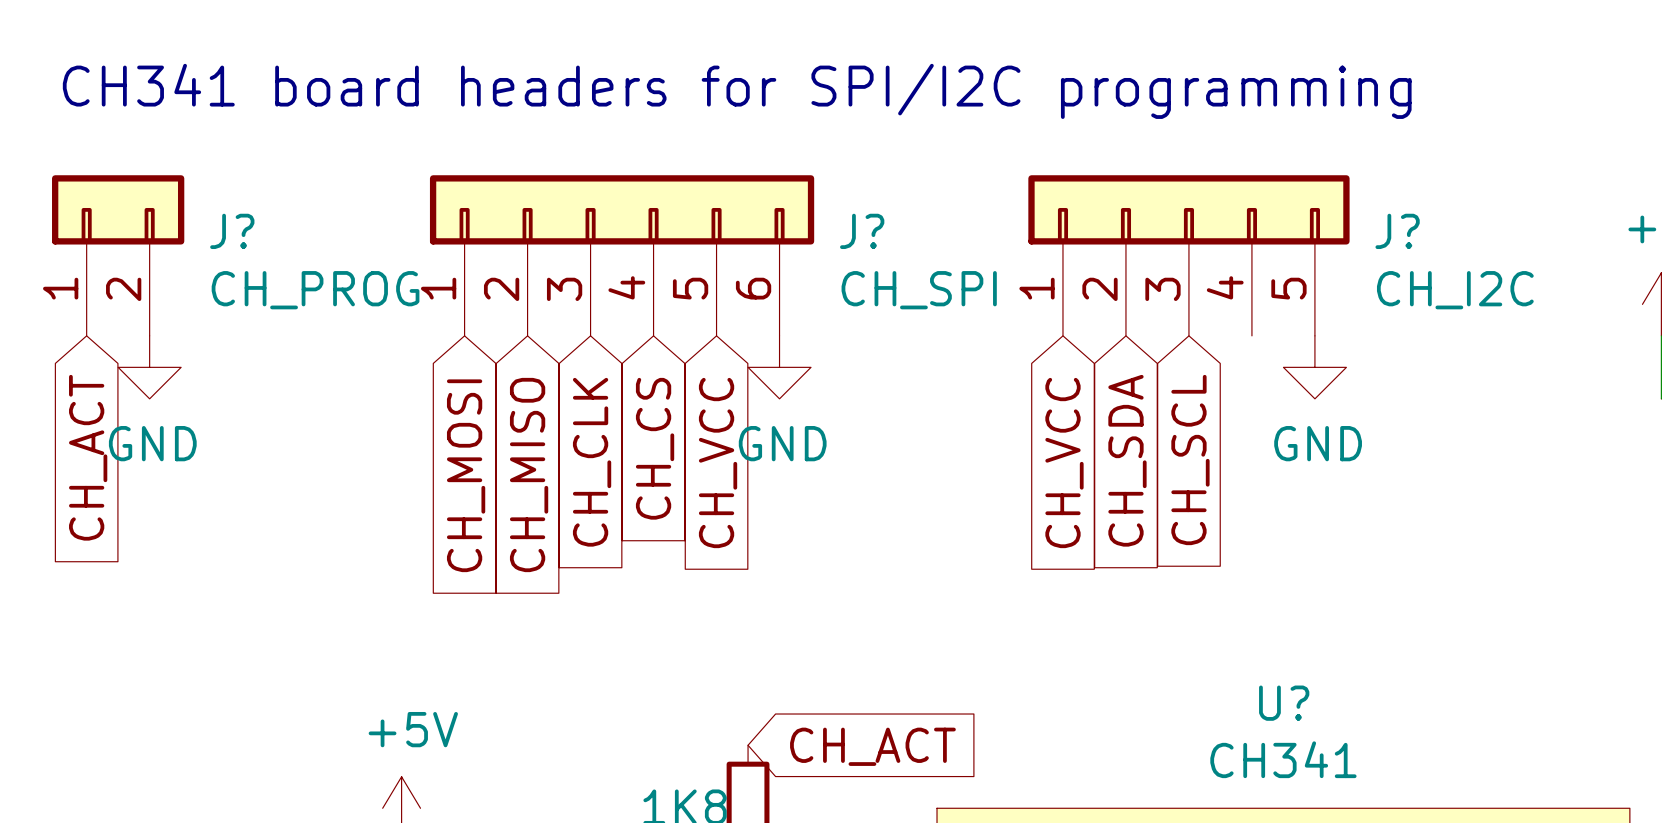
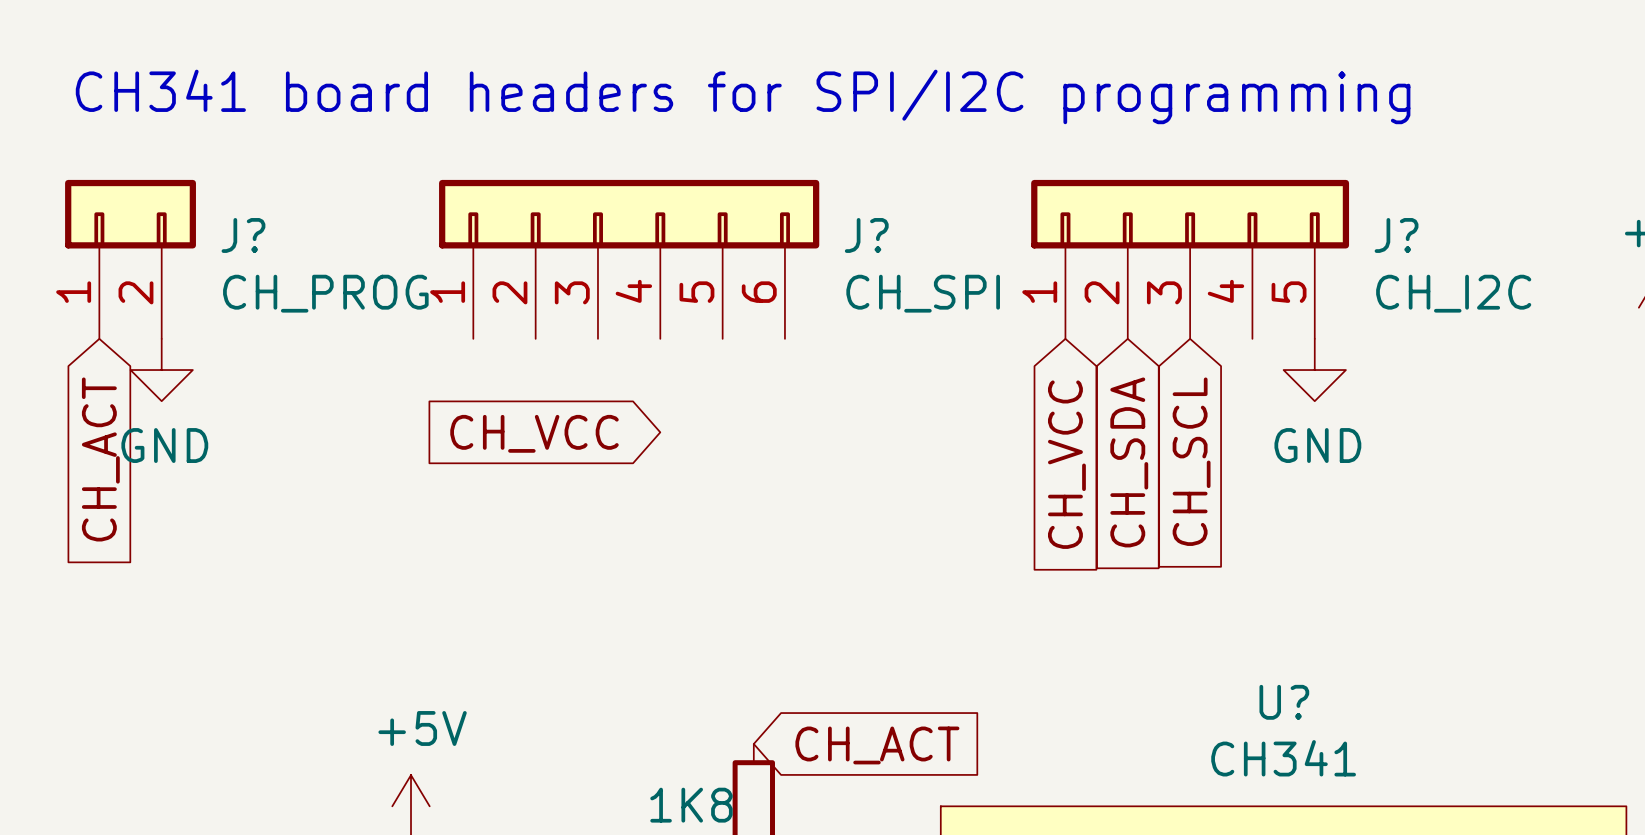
power symbol: GND (779, 367) -> none
global label: CH_CS (655, 448) -> none
global label: CH_CLK (592, 462) -> none
global label rotation: 0° (718, 463) -> 90° clockwise (534, 433)
global label: CH_MOSI (466, 475) -> none
global label: CH_MISO (529, 475) -> none

